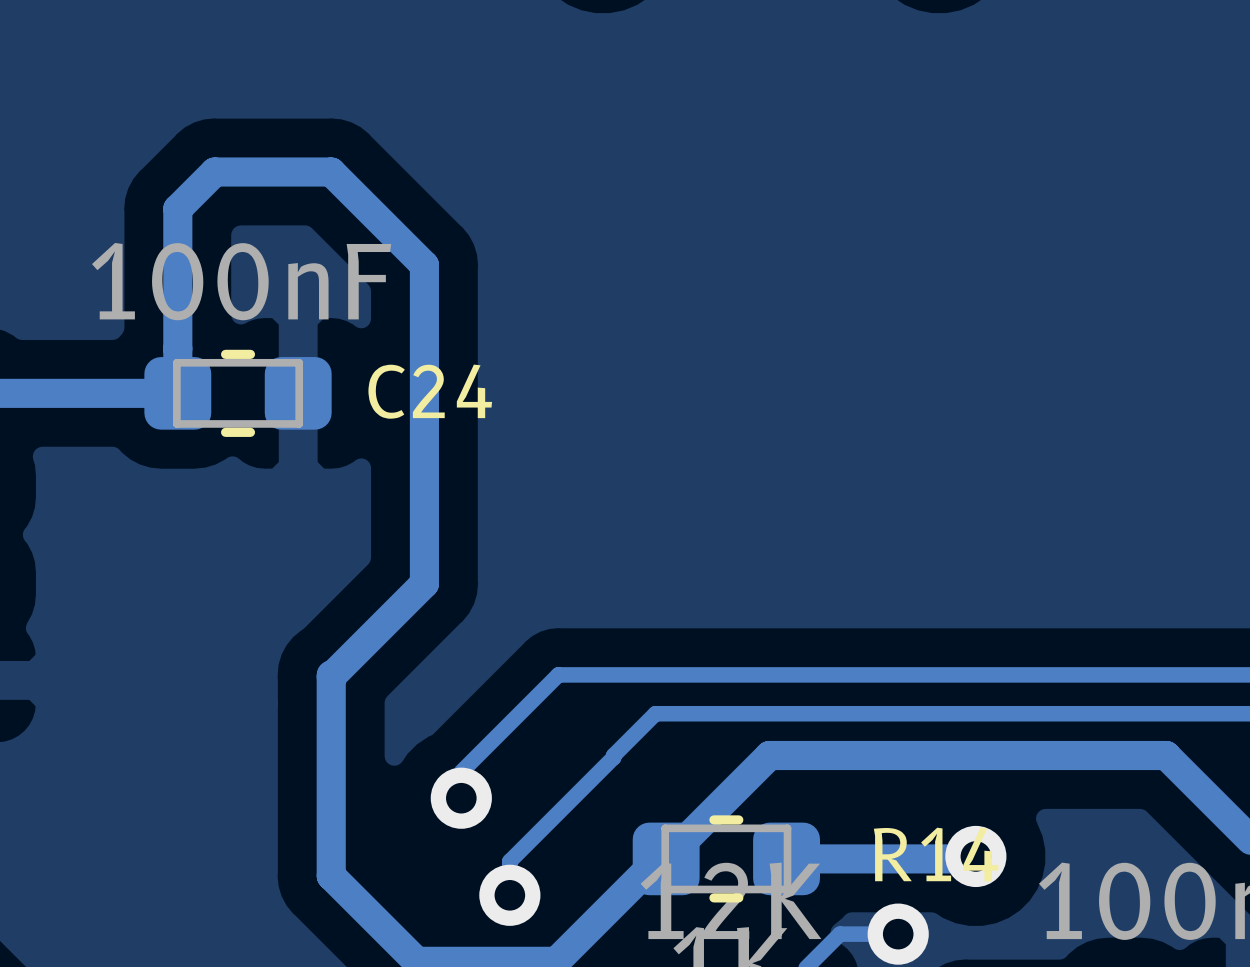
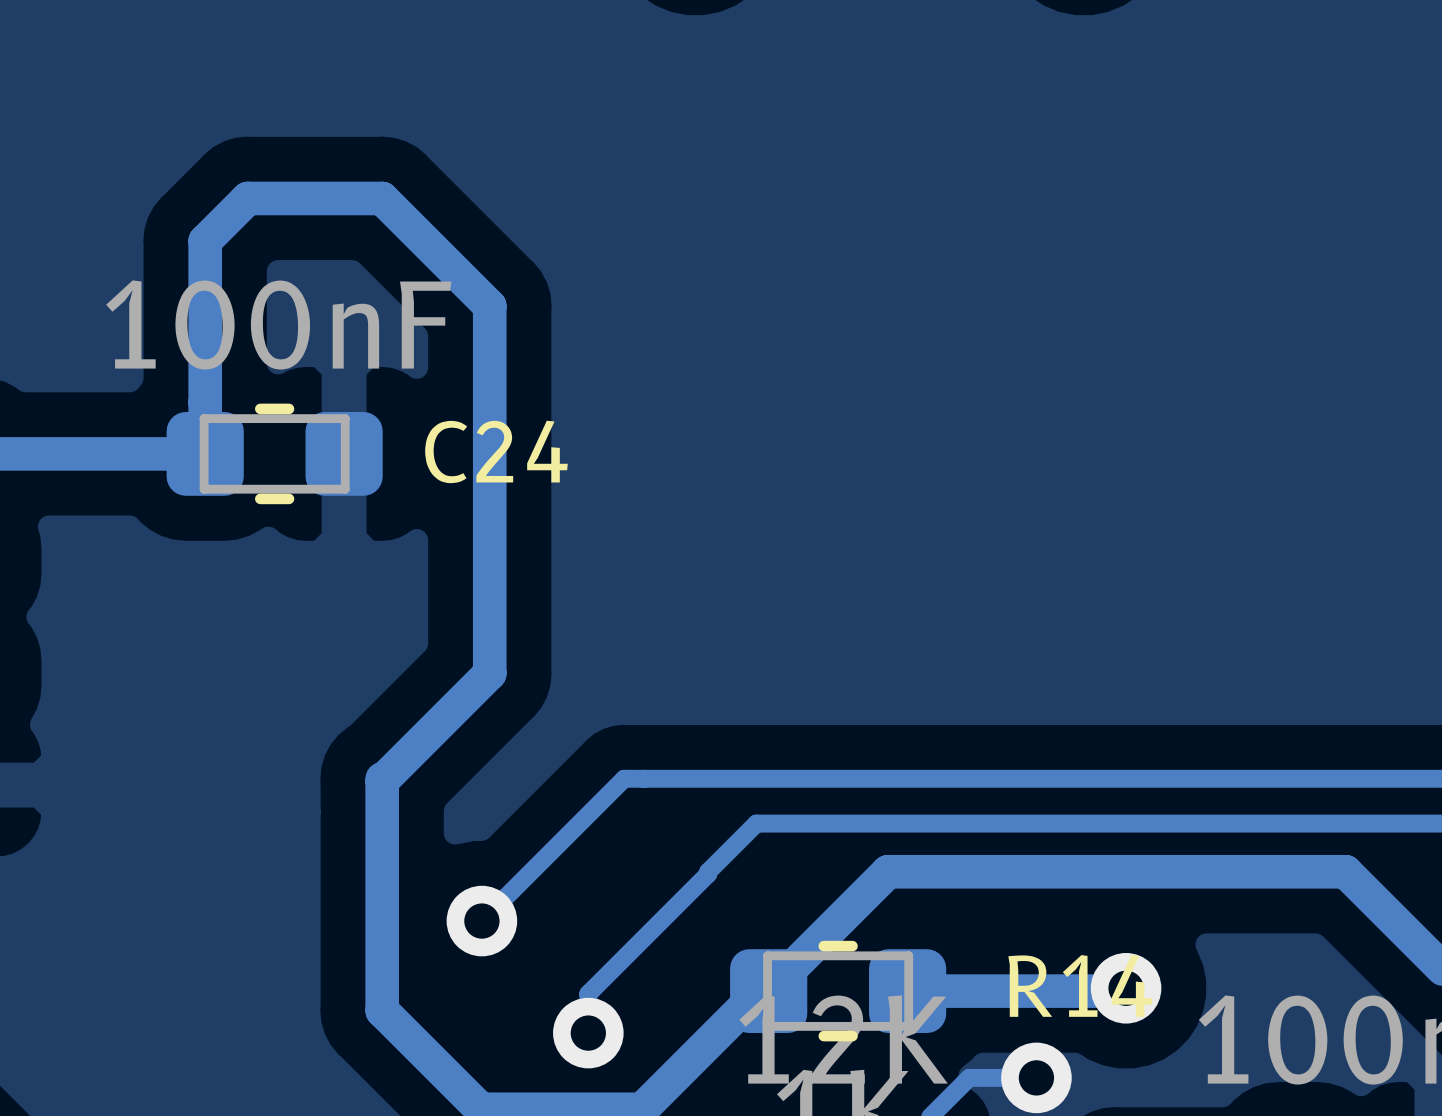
track: (558, 674) (461, 771) -> (644, 778) (624, 778) (481, 921)
via position: (461, 798) -> (481, 921)

